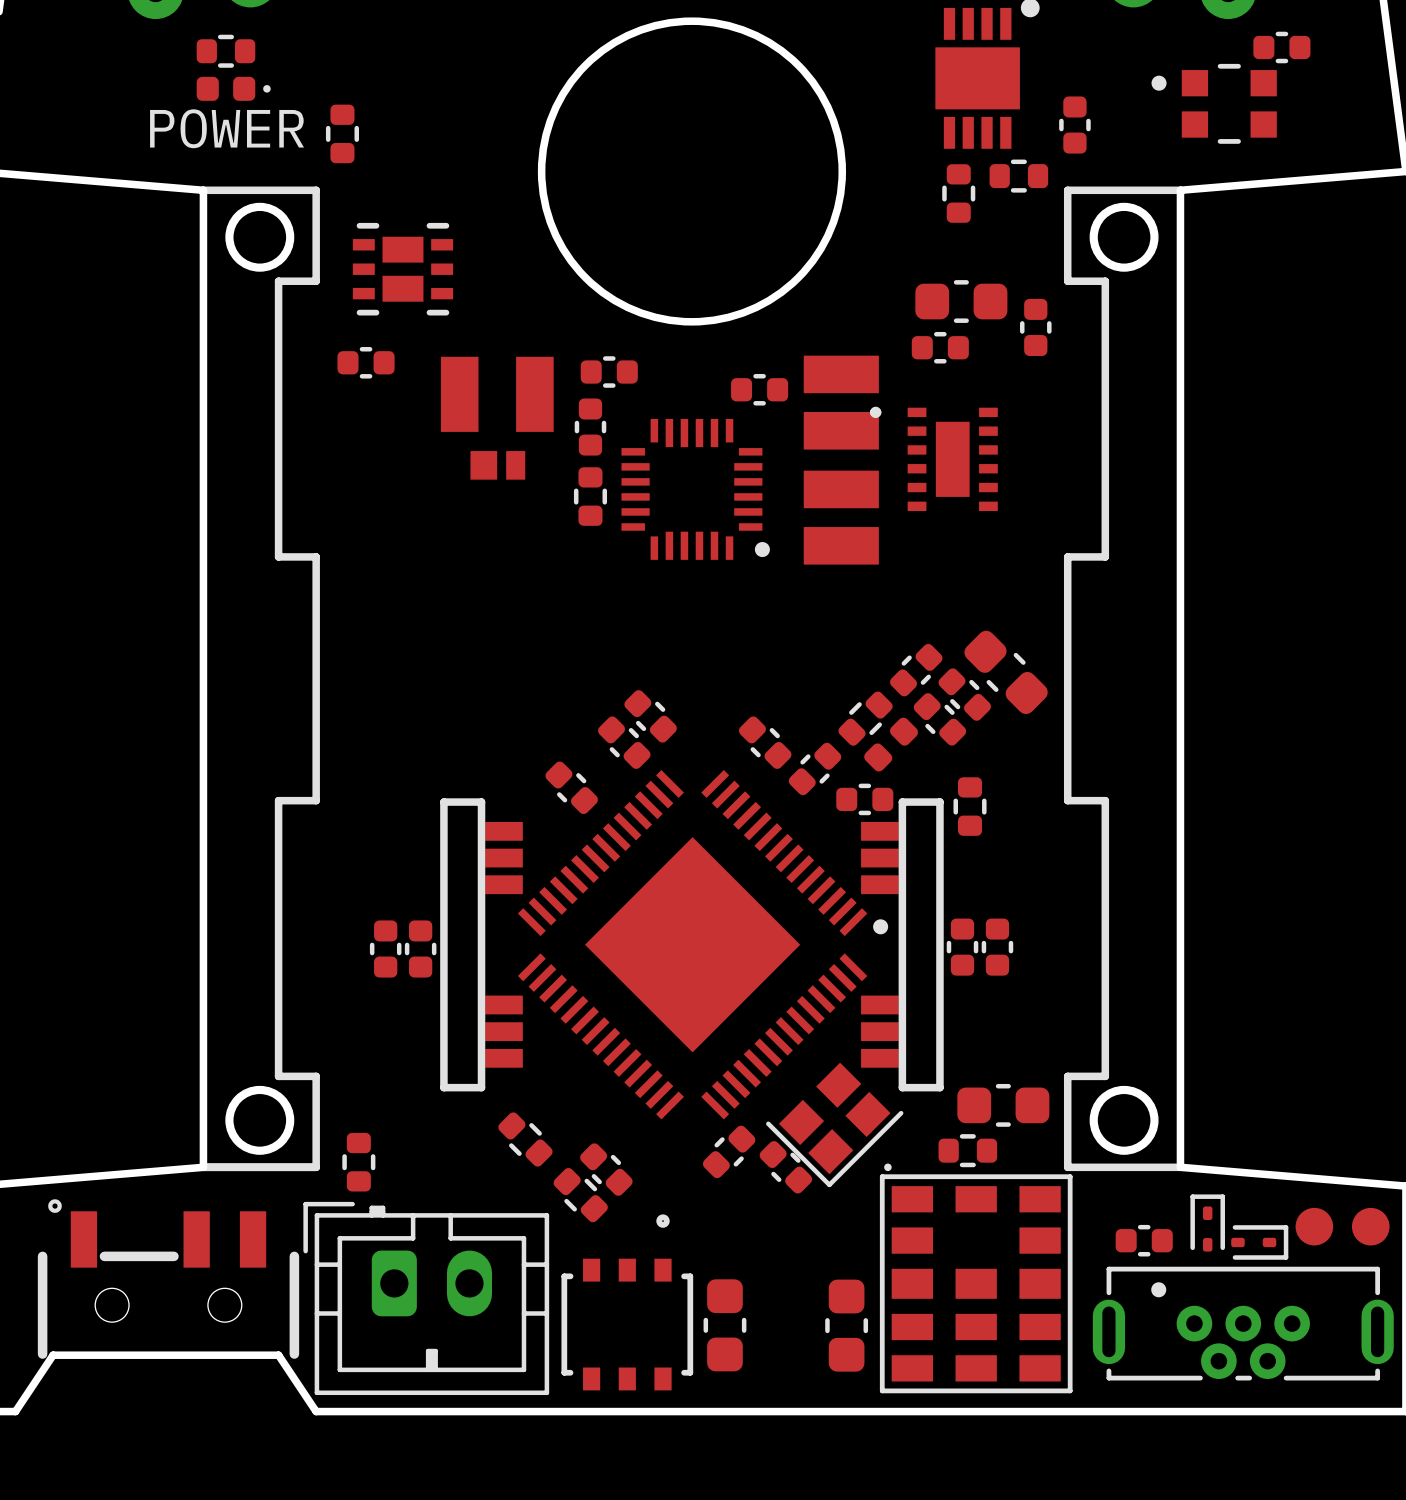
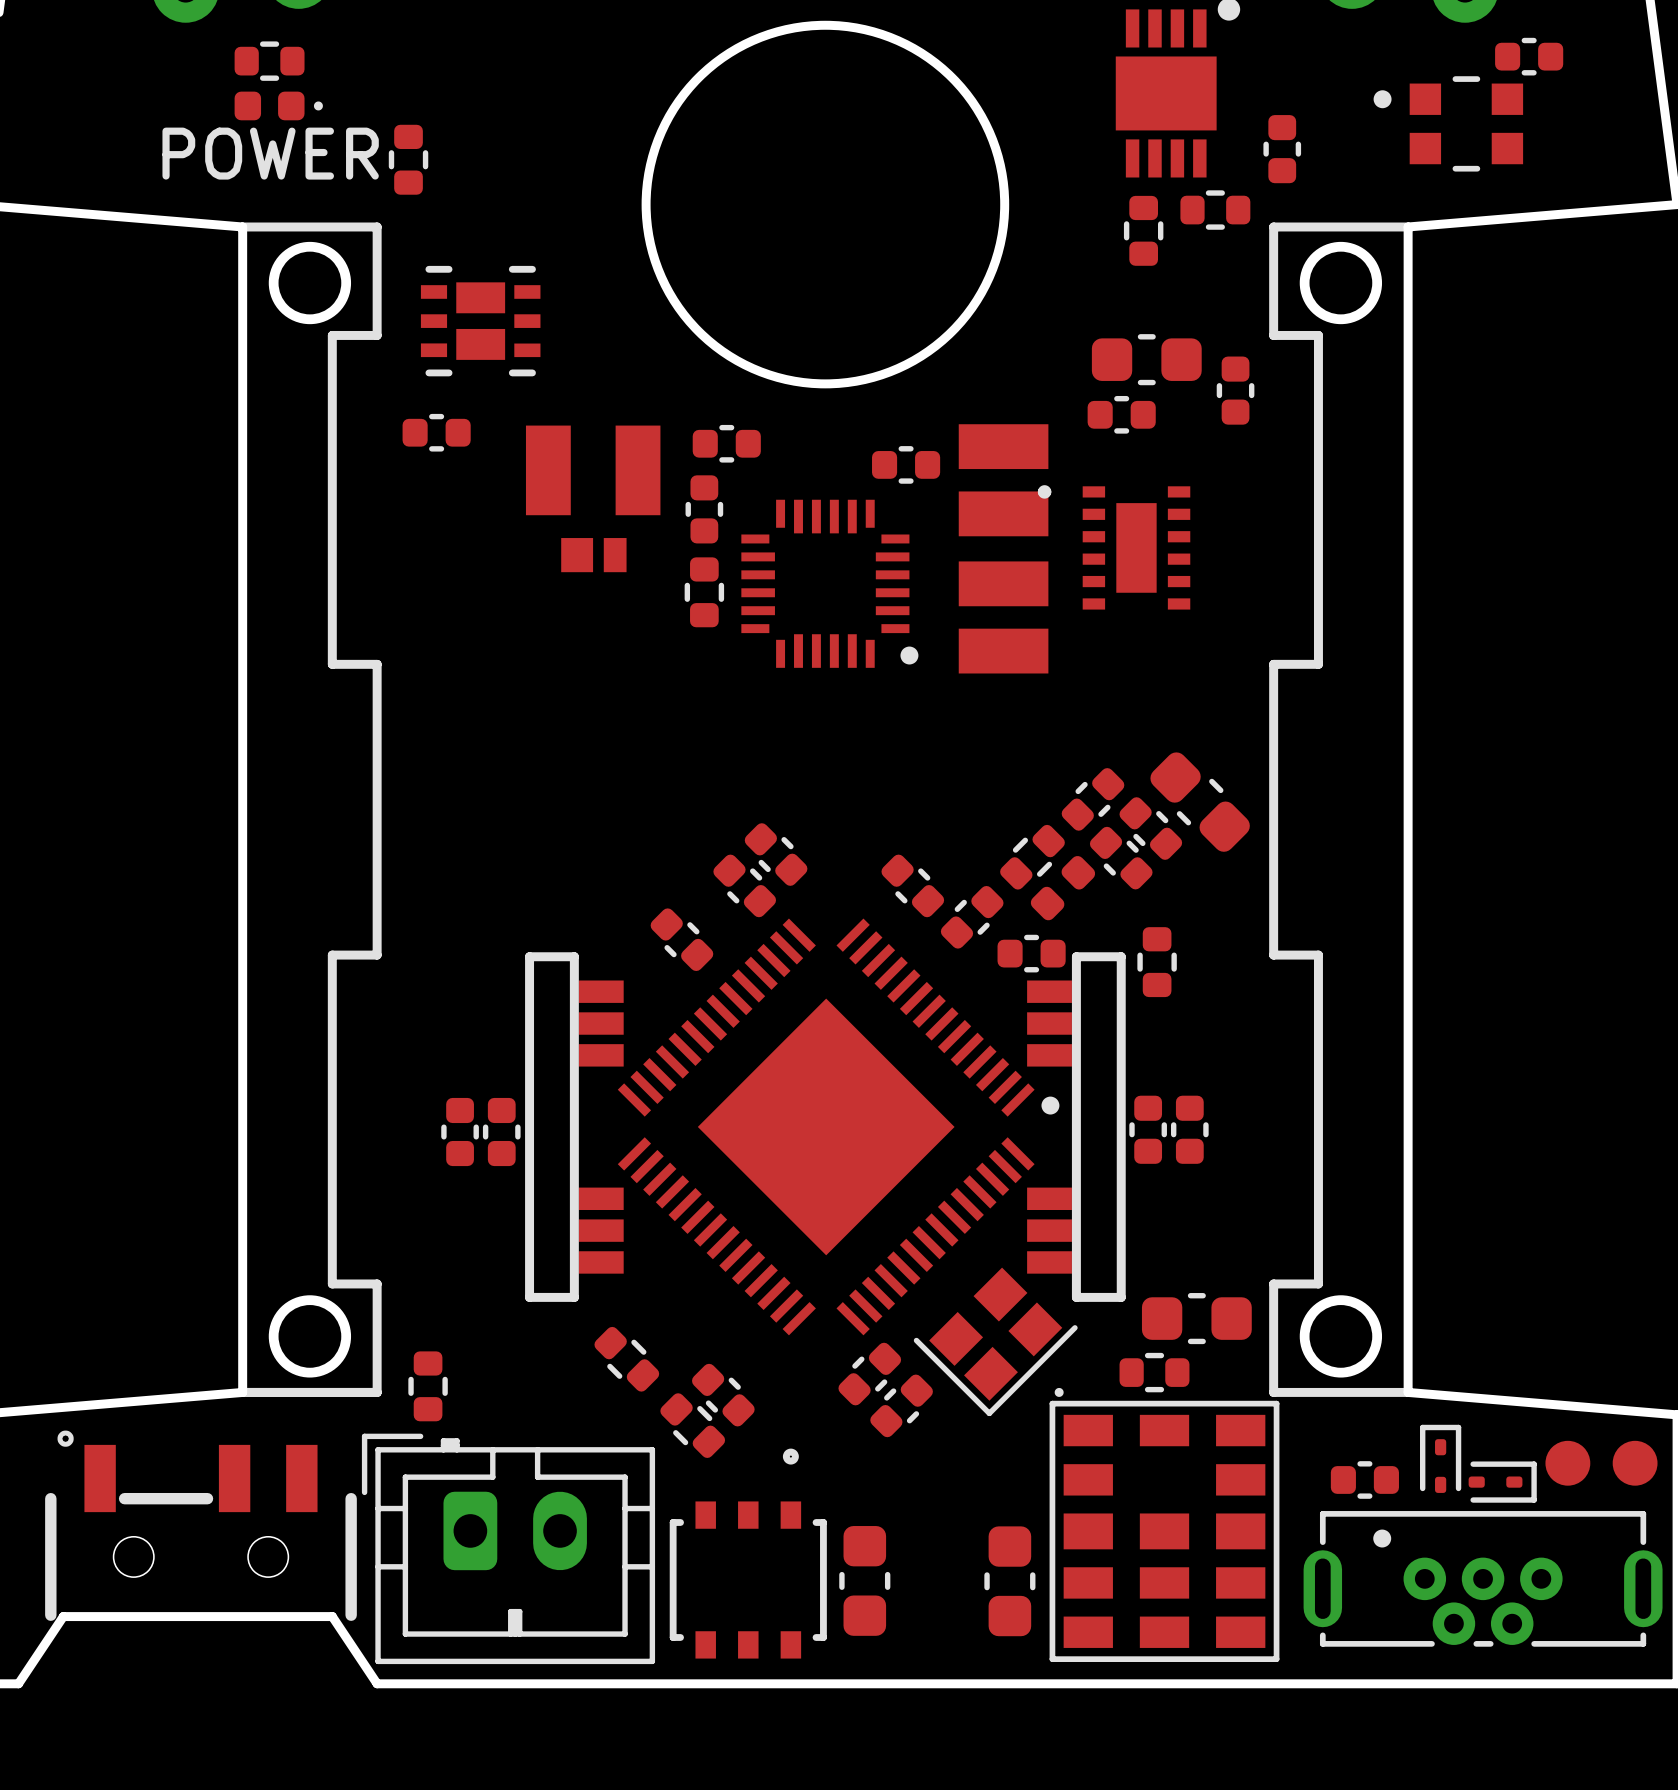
part rotation: 0° (785, 1167) -> 90° clockwise (901, 1405)
part position: (785, 1167) -> (901, 1405)

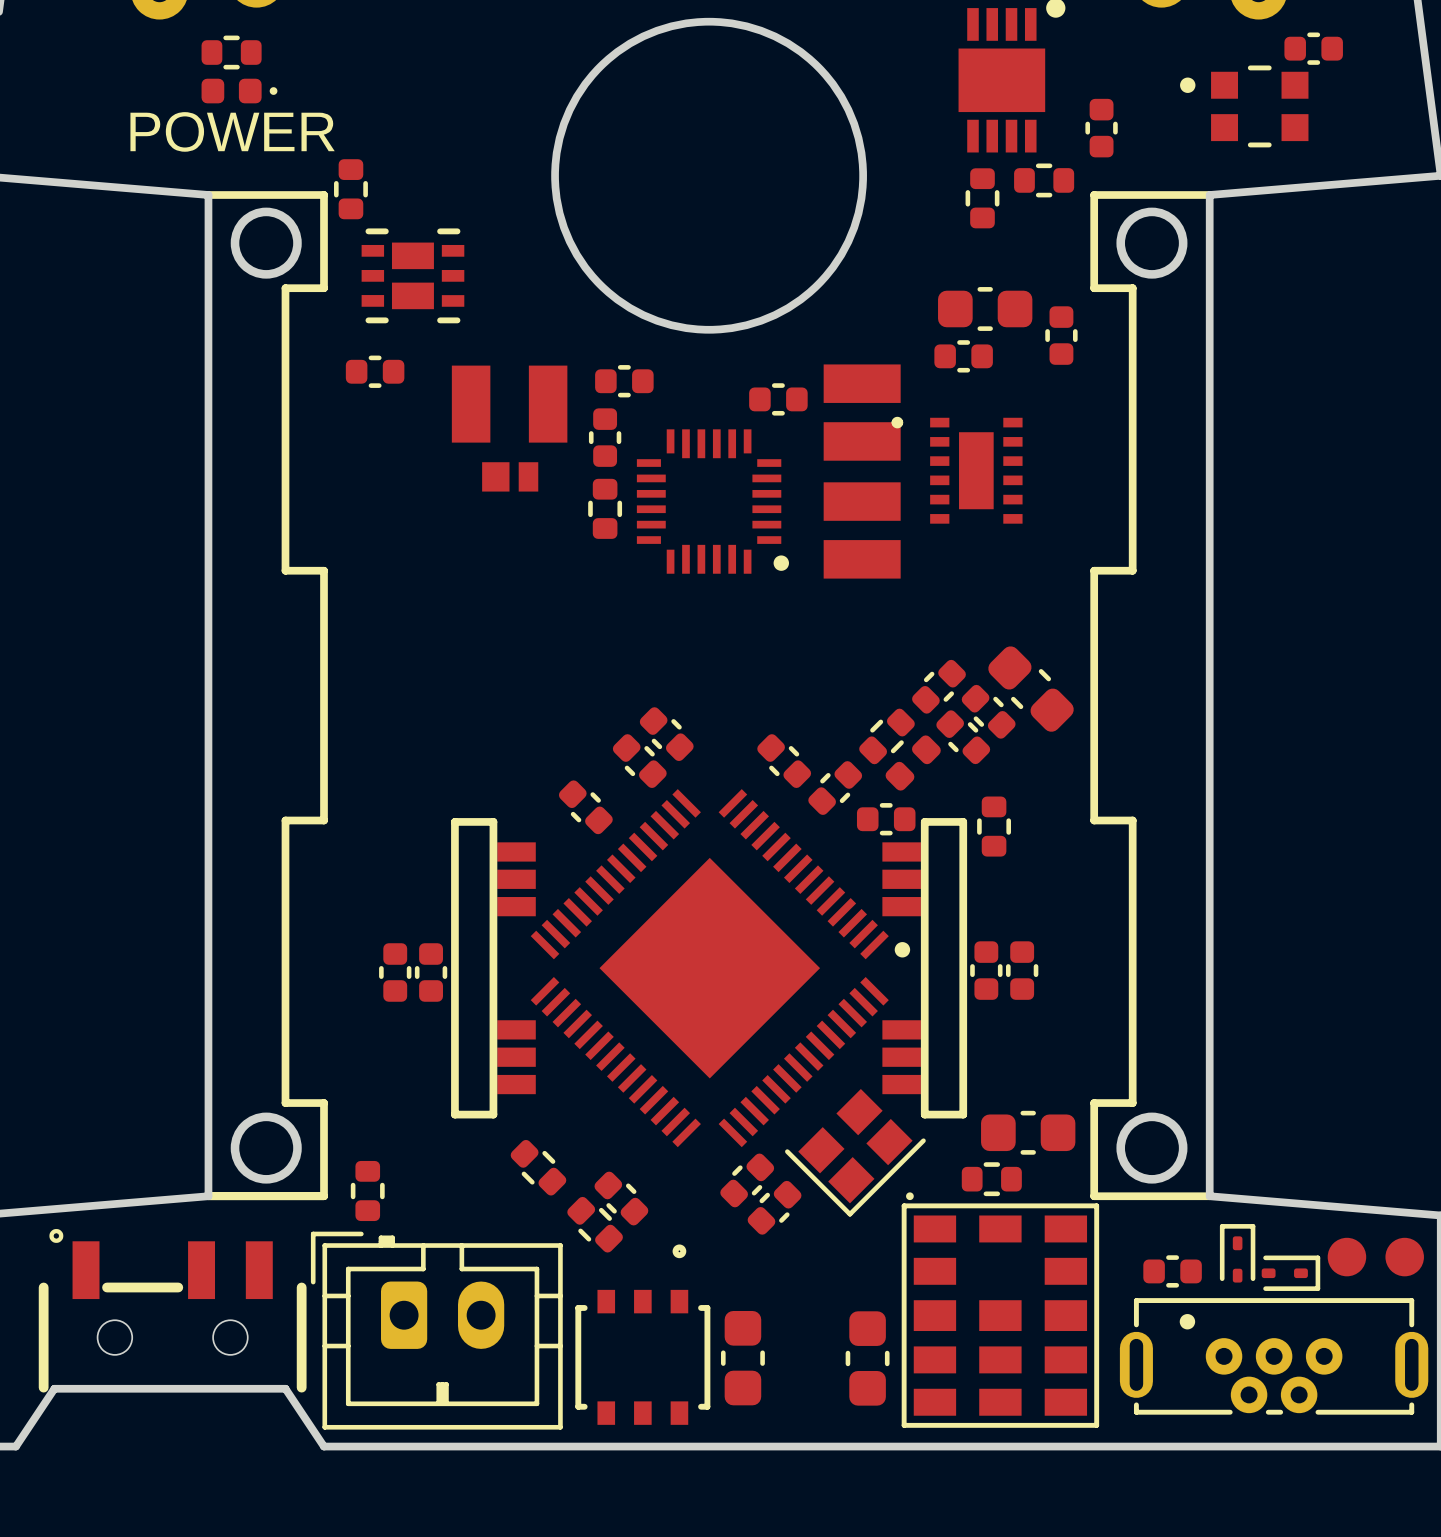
part position: (408, 159) -> (350, 189)

